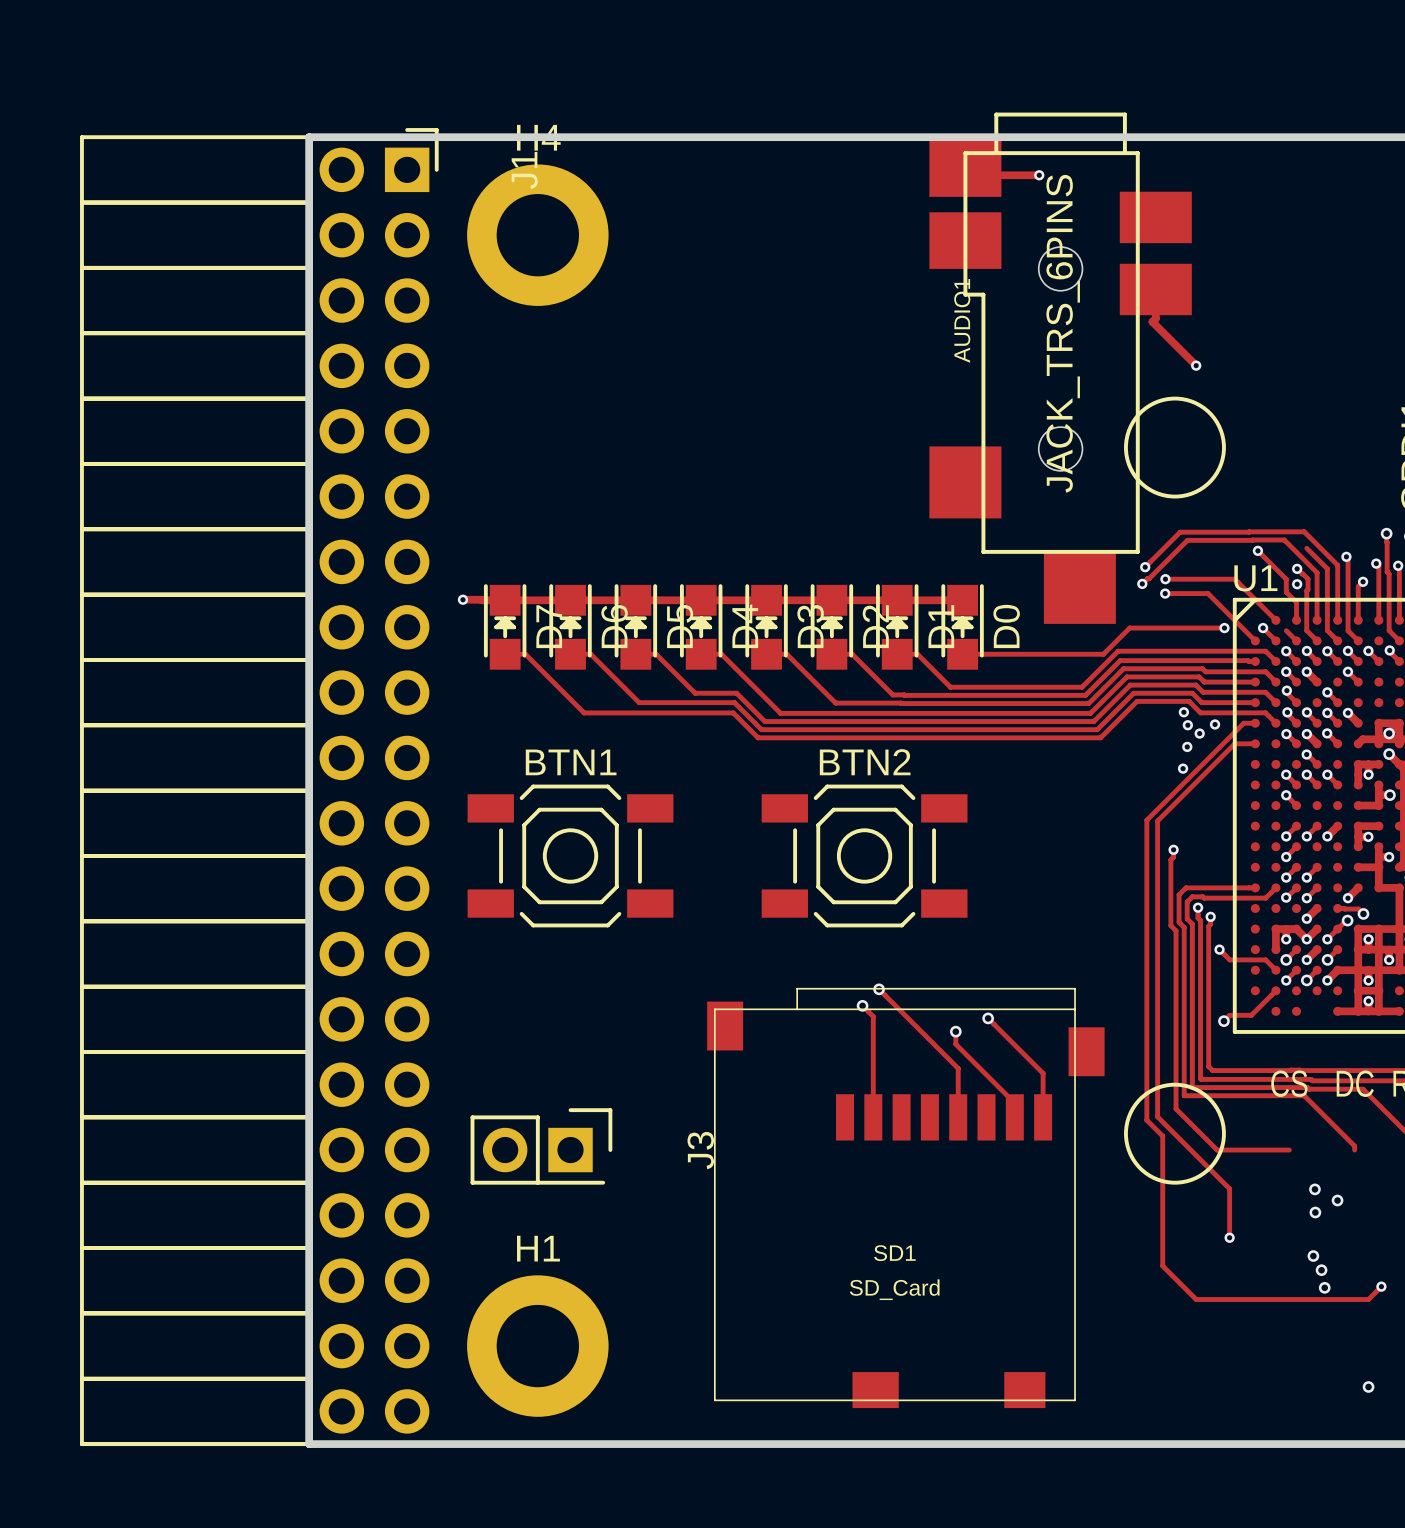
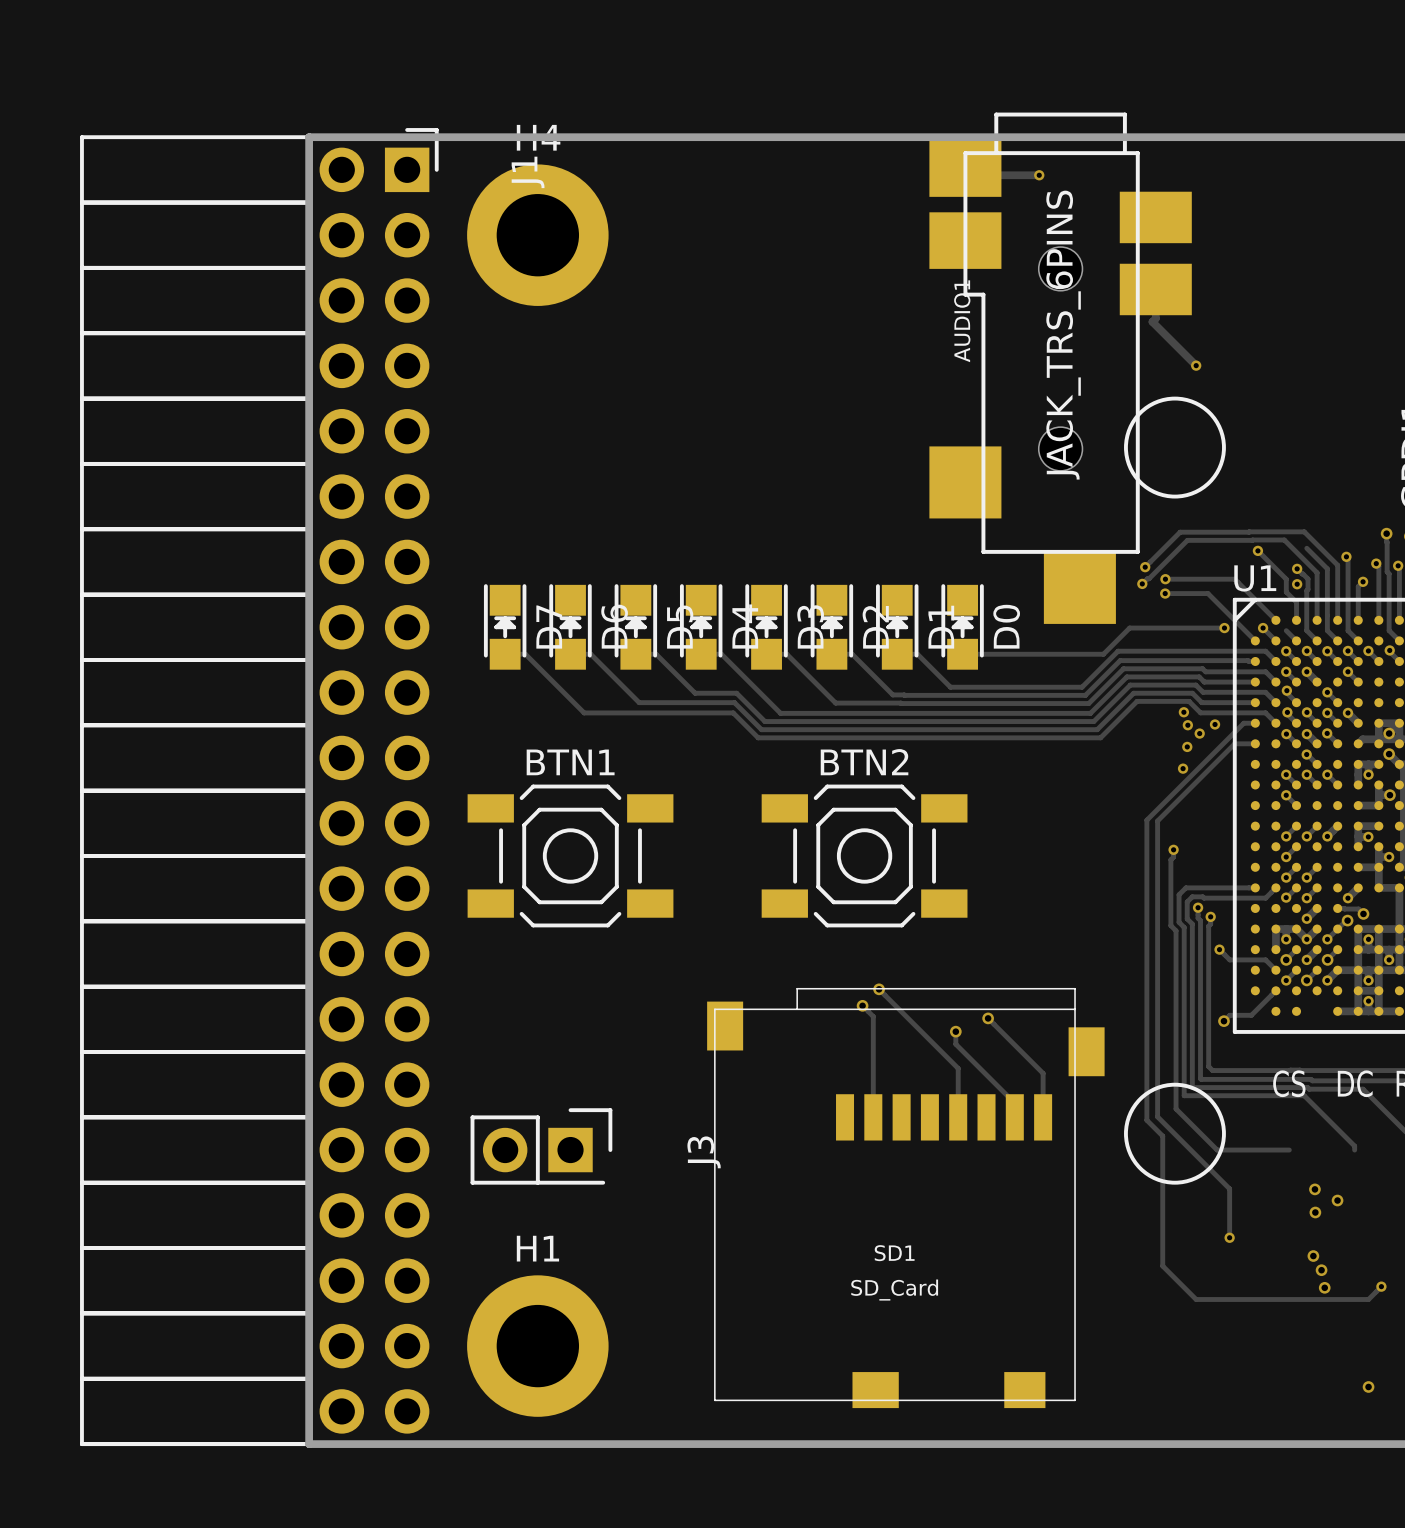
track: (462, 599) (962, 600) -> none
via: (462, 599) -> none

